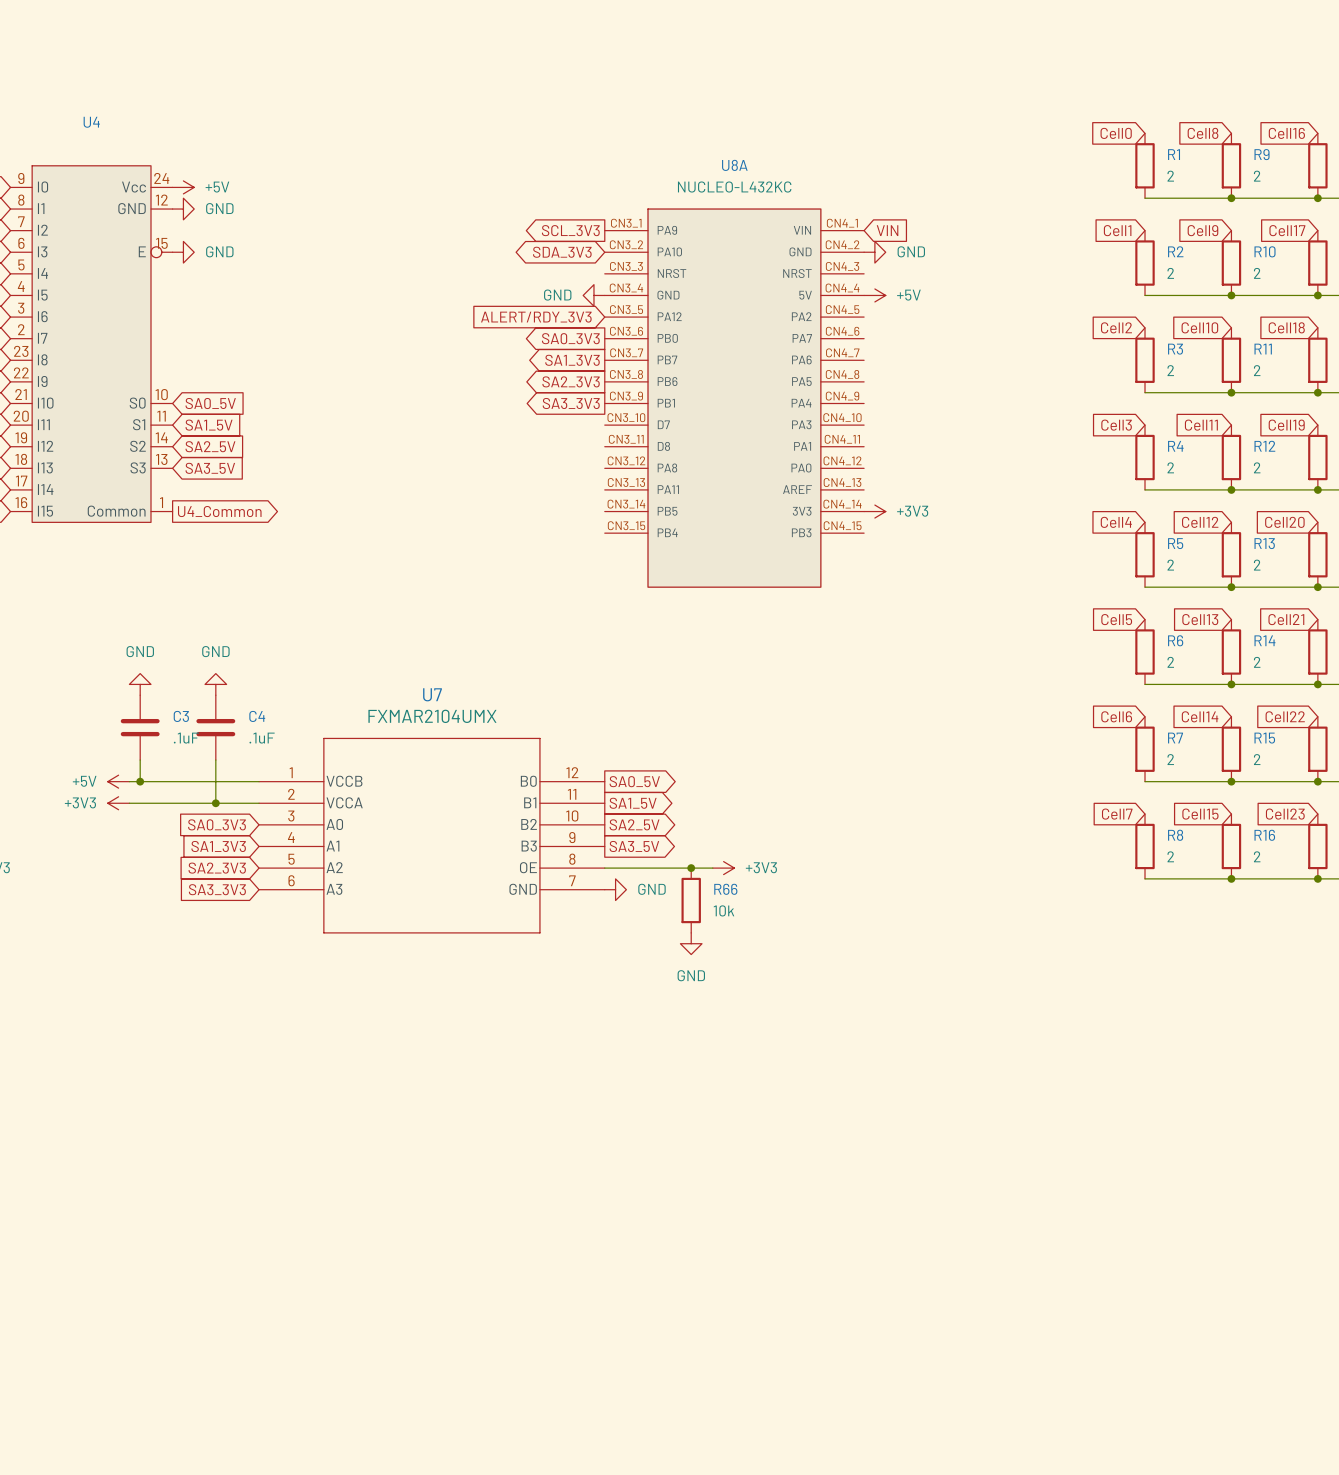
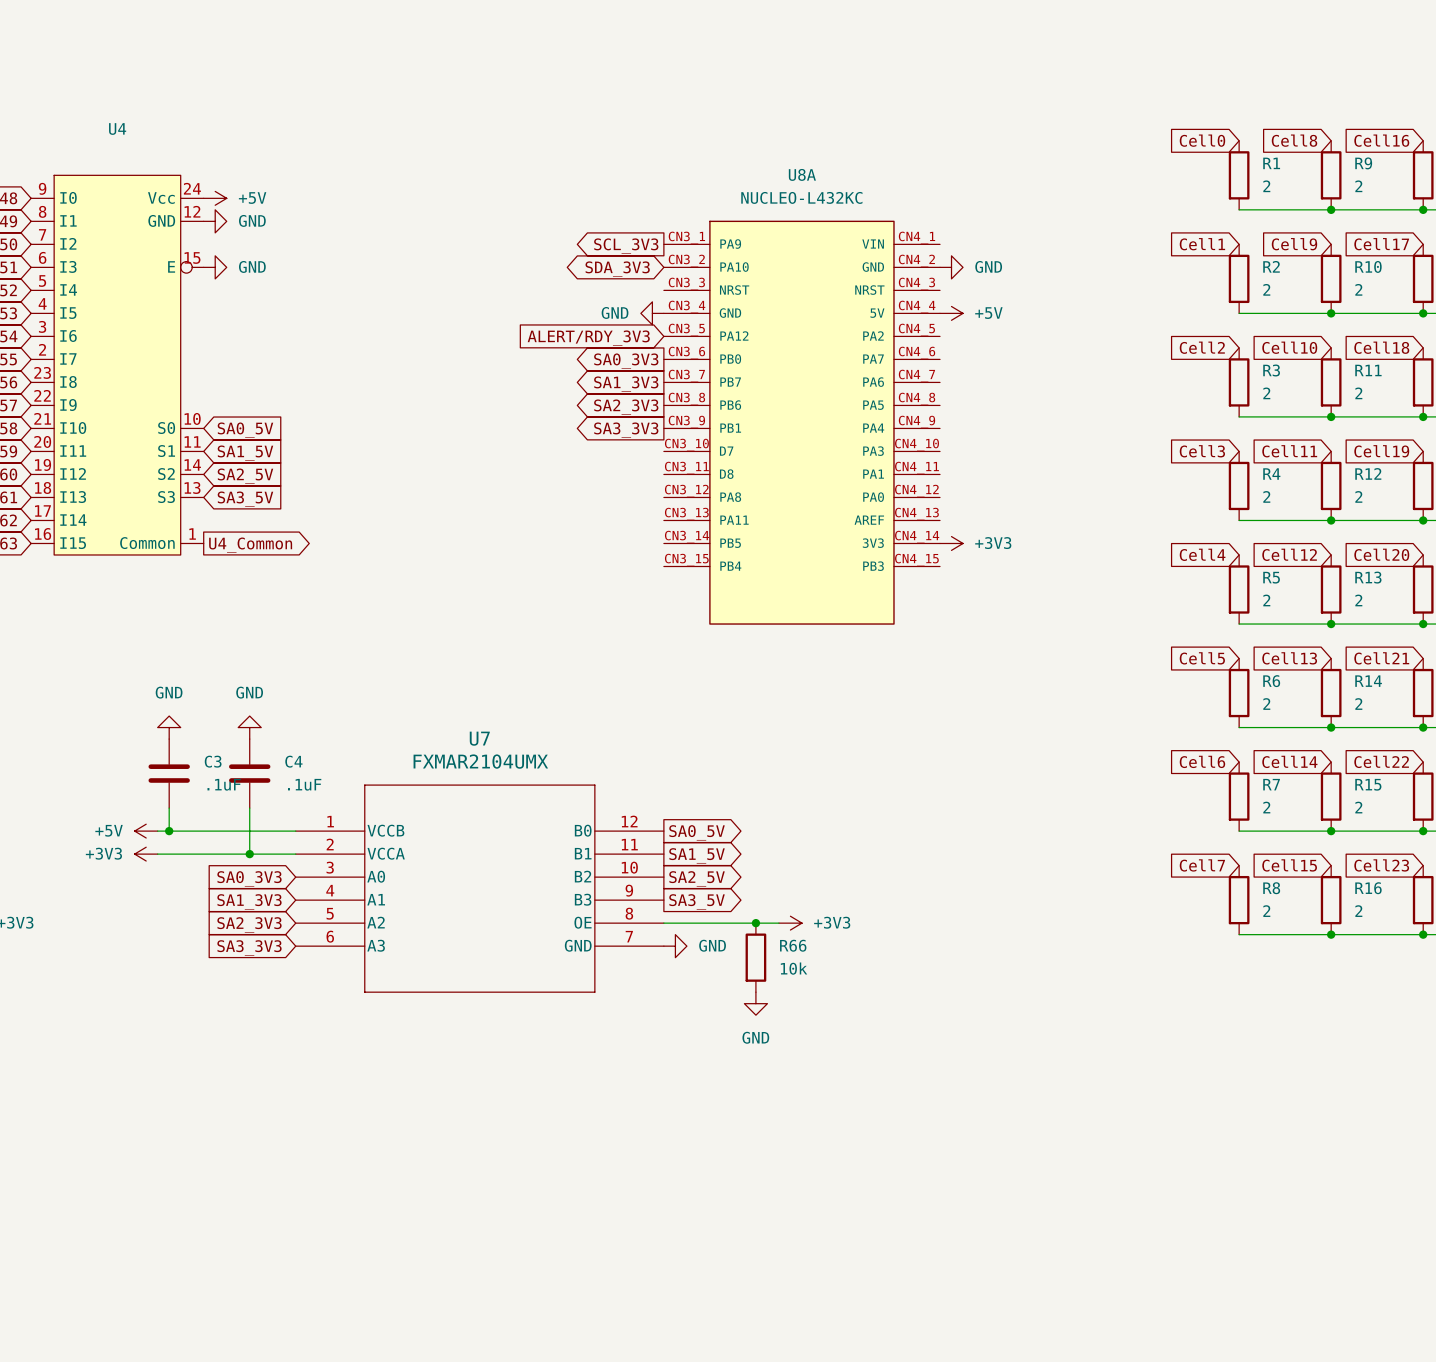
global label: VIN (887, 230) -> none

